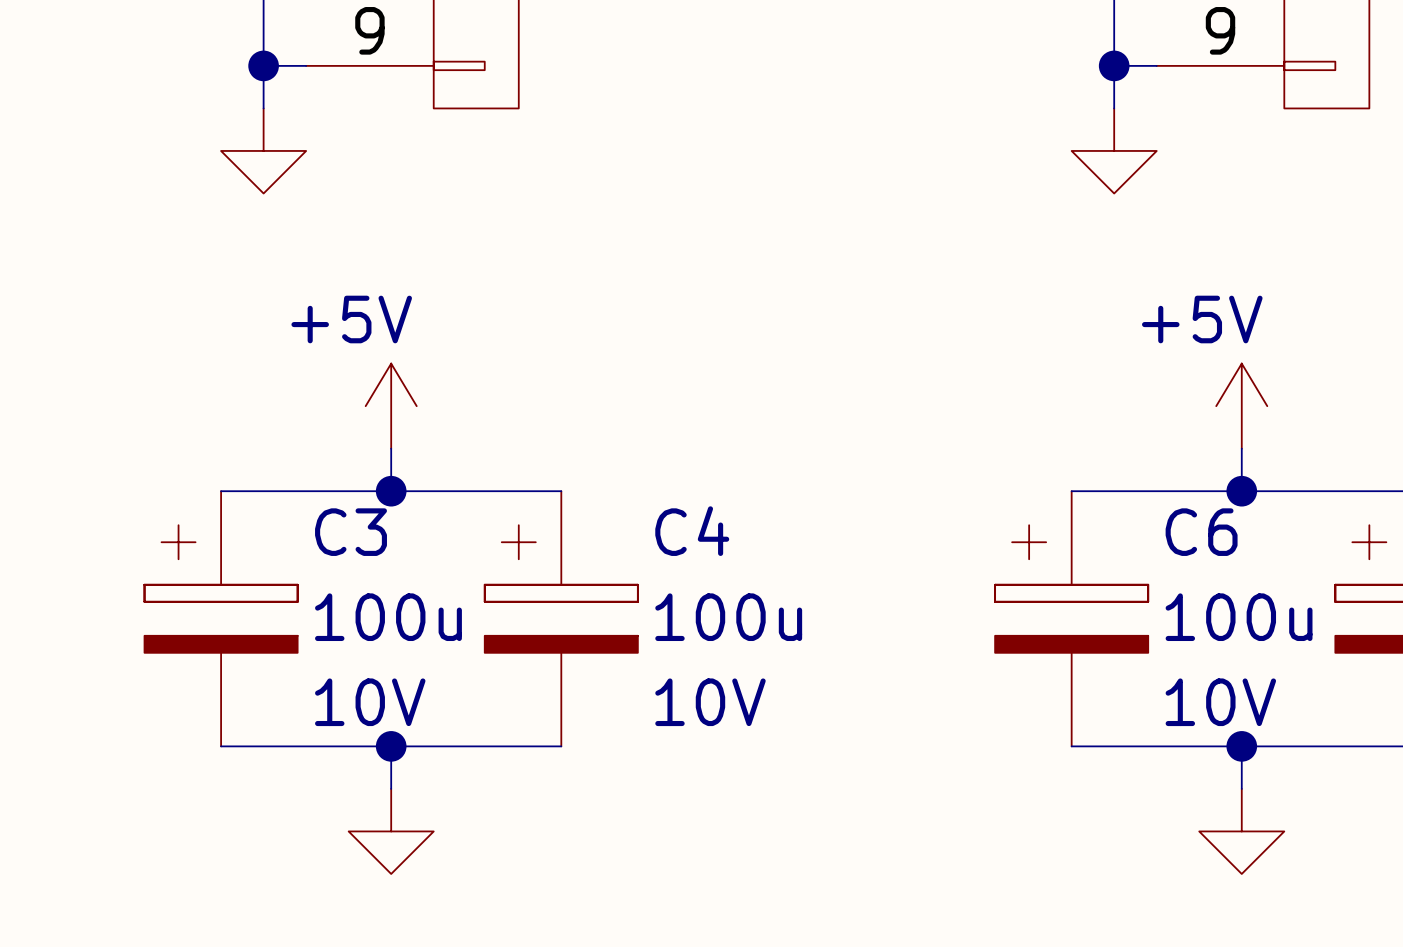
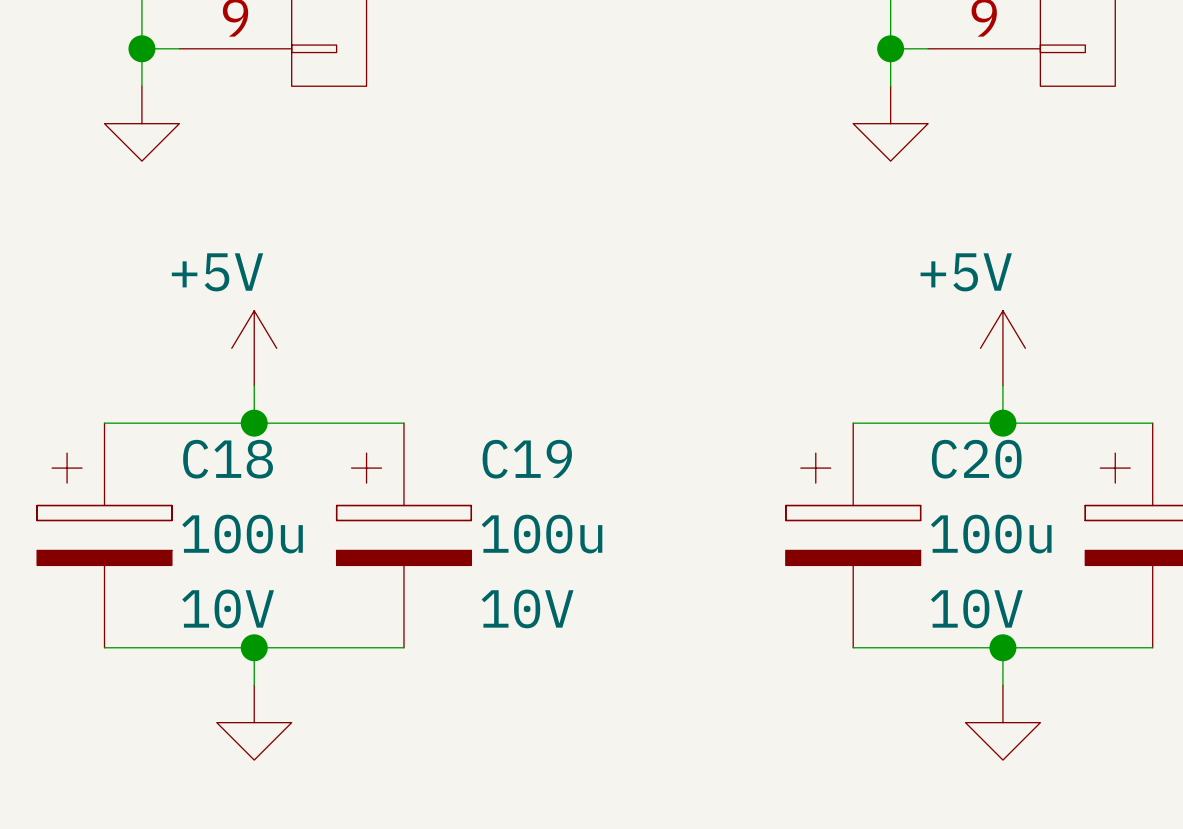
C4 name: C4 (692, 531) -> C19 (527, 459)
C3 name: C3 (351, 532) -> C18 (228, 459)
C6 name: C6 (1201, 532) -> C20 (976, 459)

